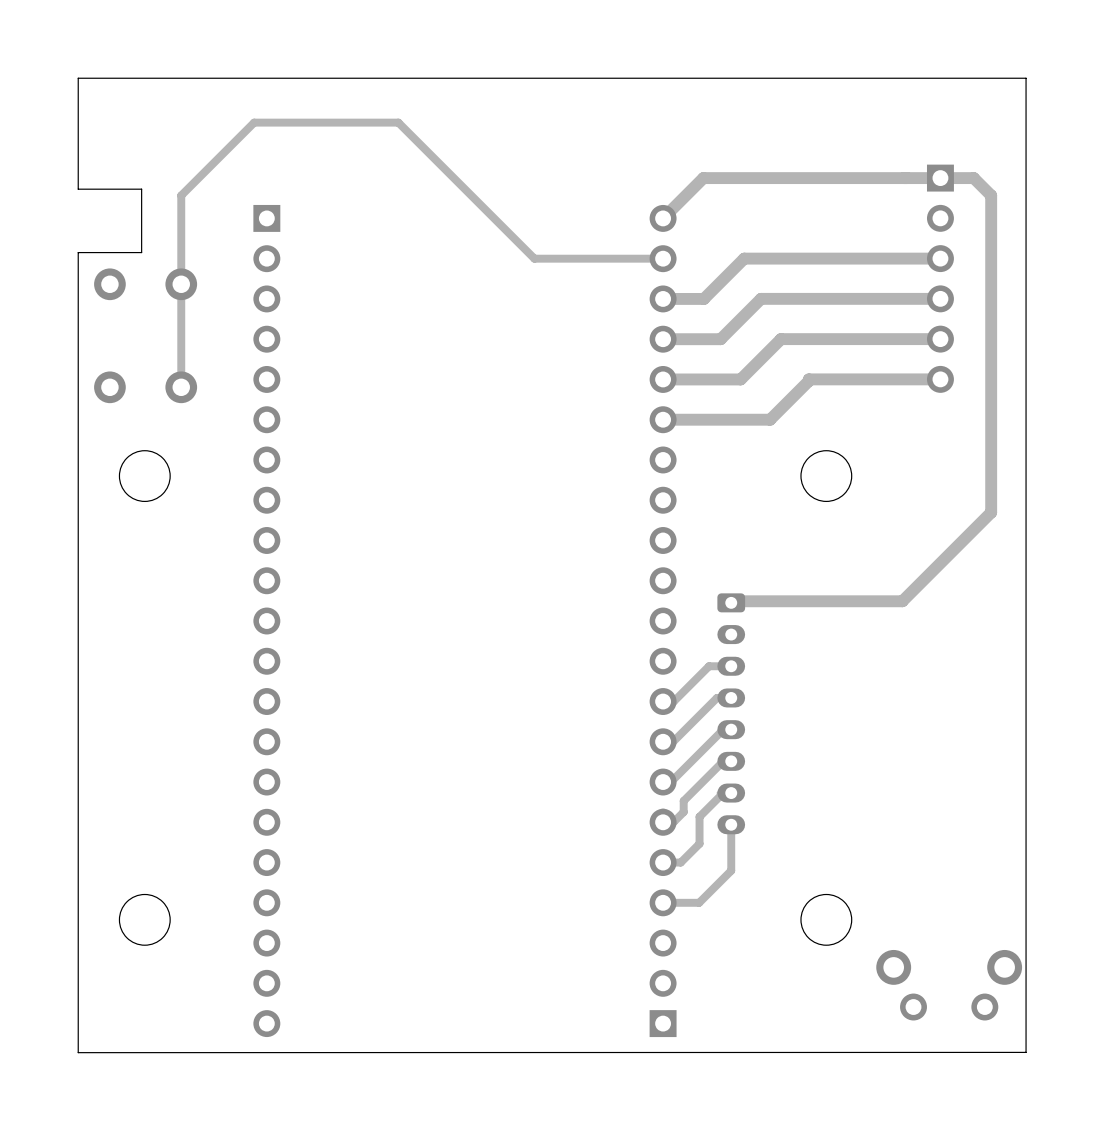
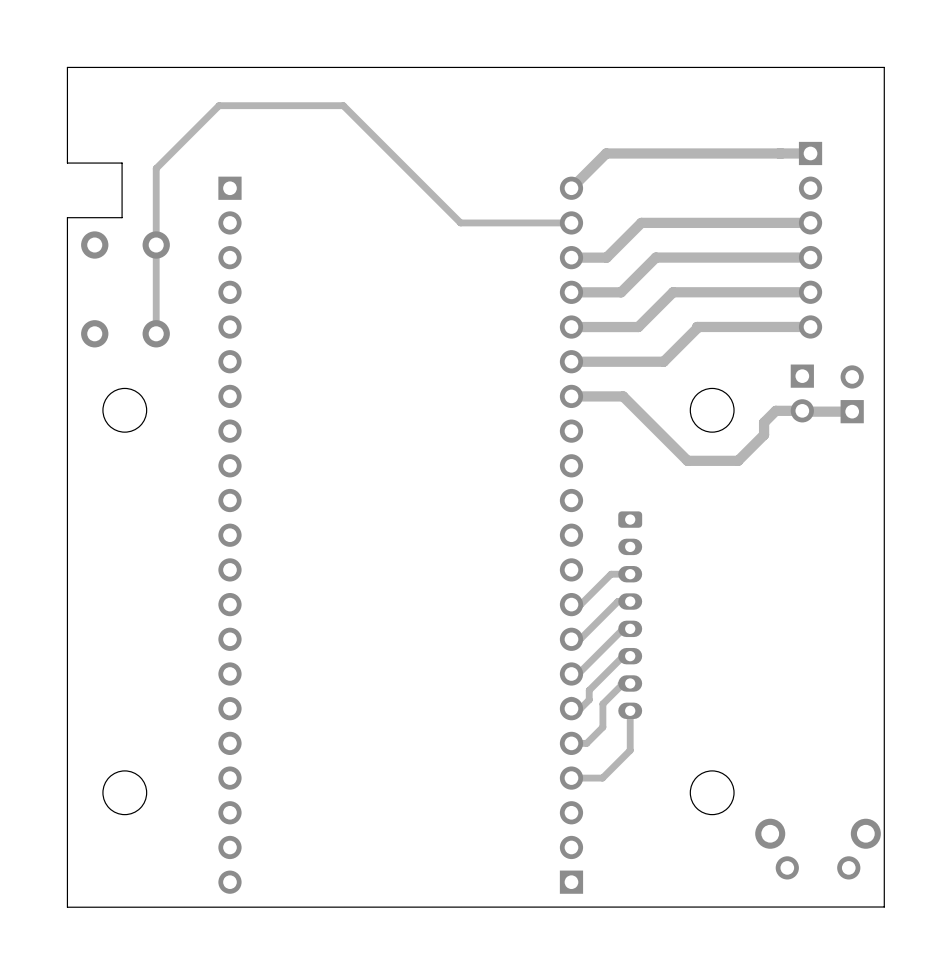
track: (940, 178) (973, 178) (991, 195) (991, 512) (902, 601) (732, 601) -> none
part: none -> (802, 393)
part: none -> (852, 394)
track: none -> (571, 396) (623, 396) (687, 460) (738, 460) (764, 434) (764, 422) (775, 410) (802, 410)
track: none -> (852, 411) (803, 411)

